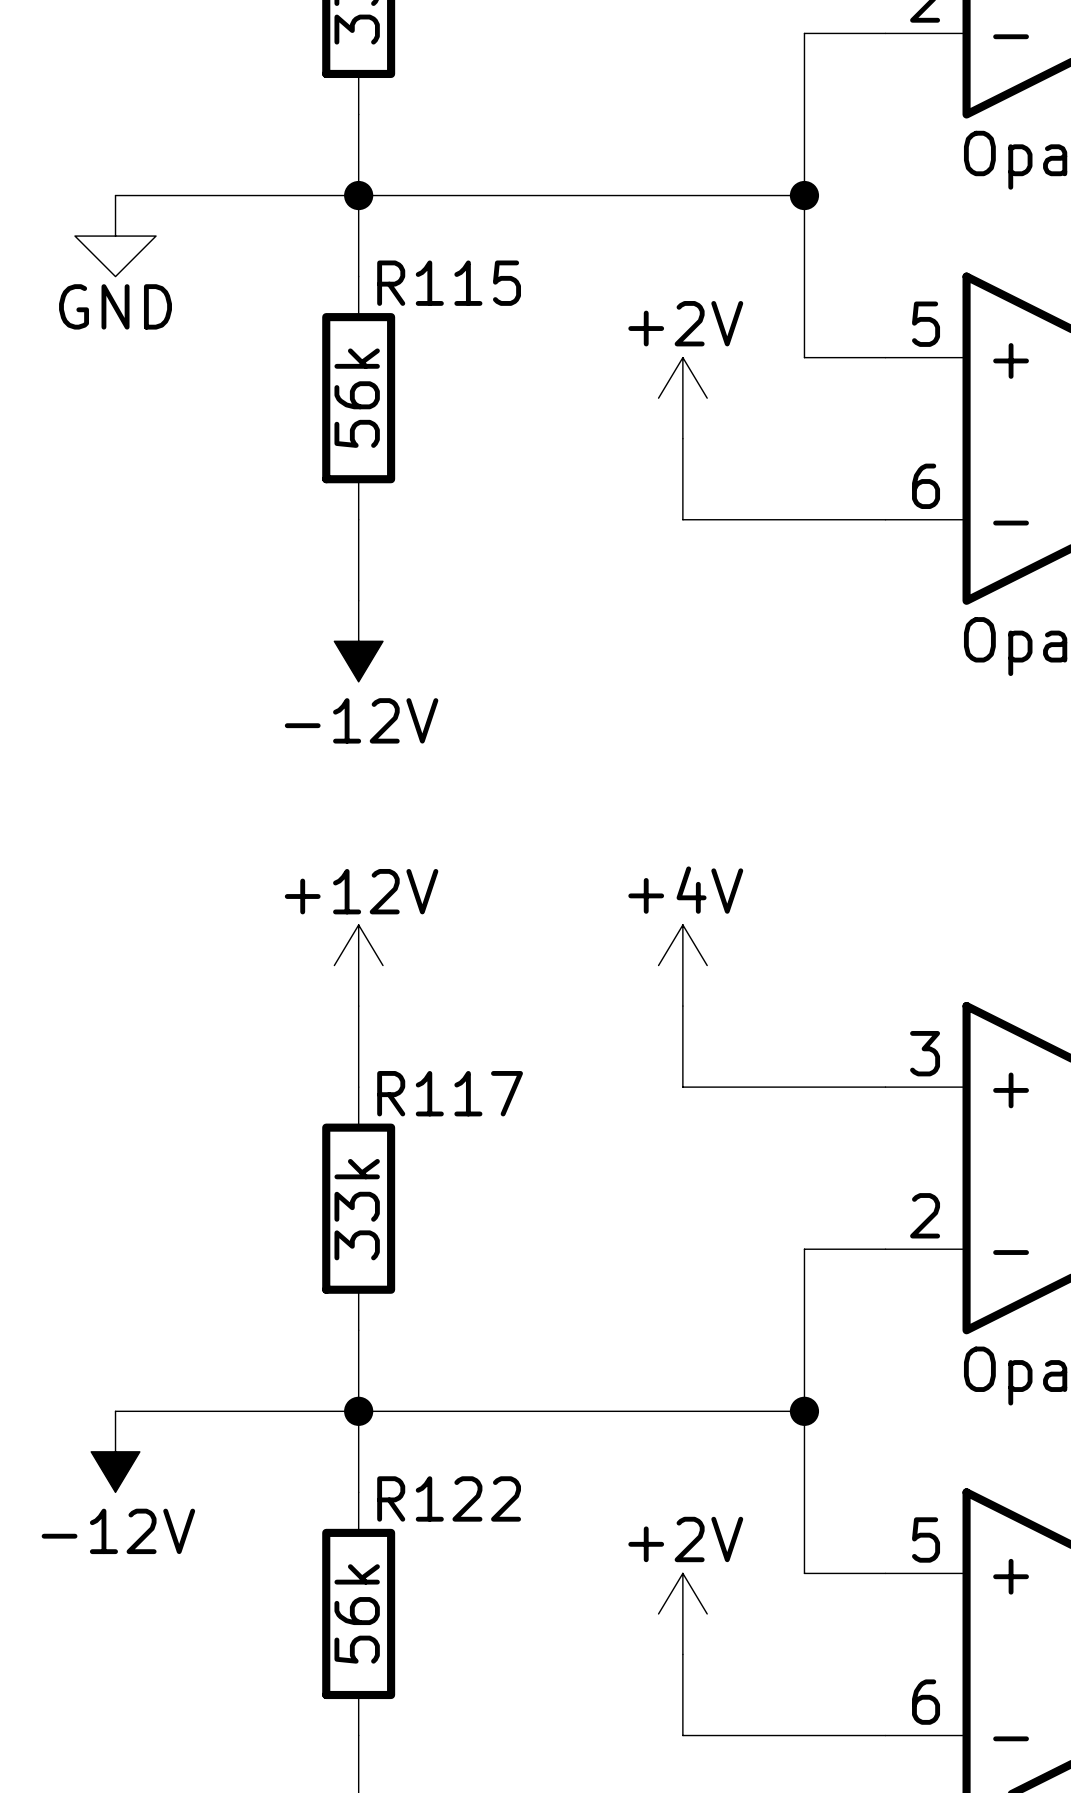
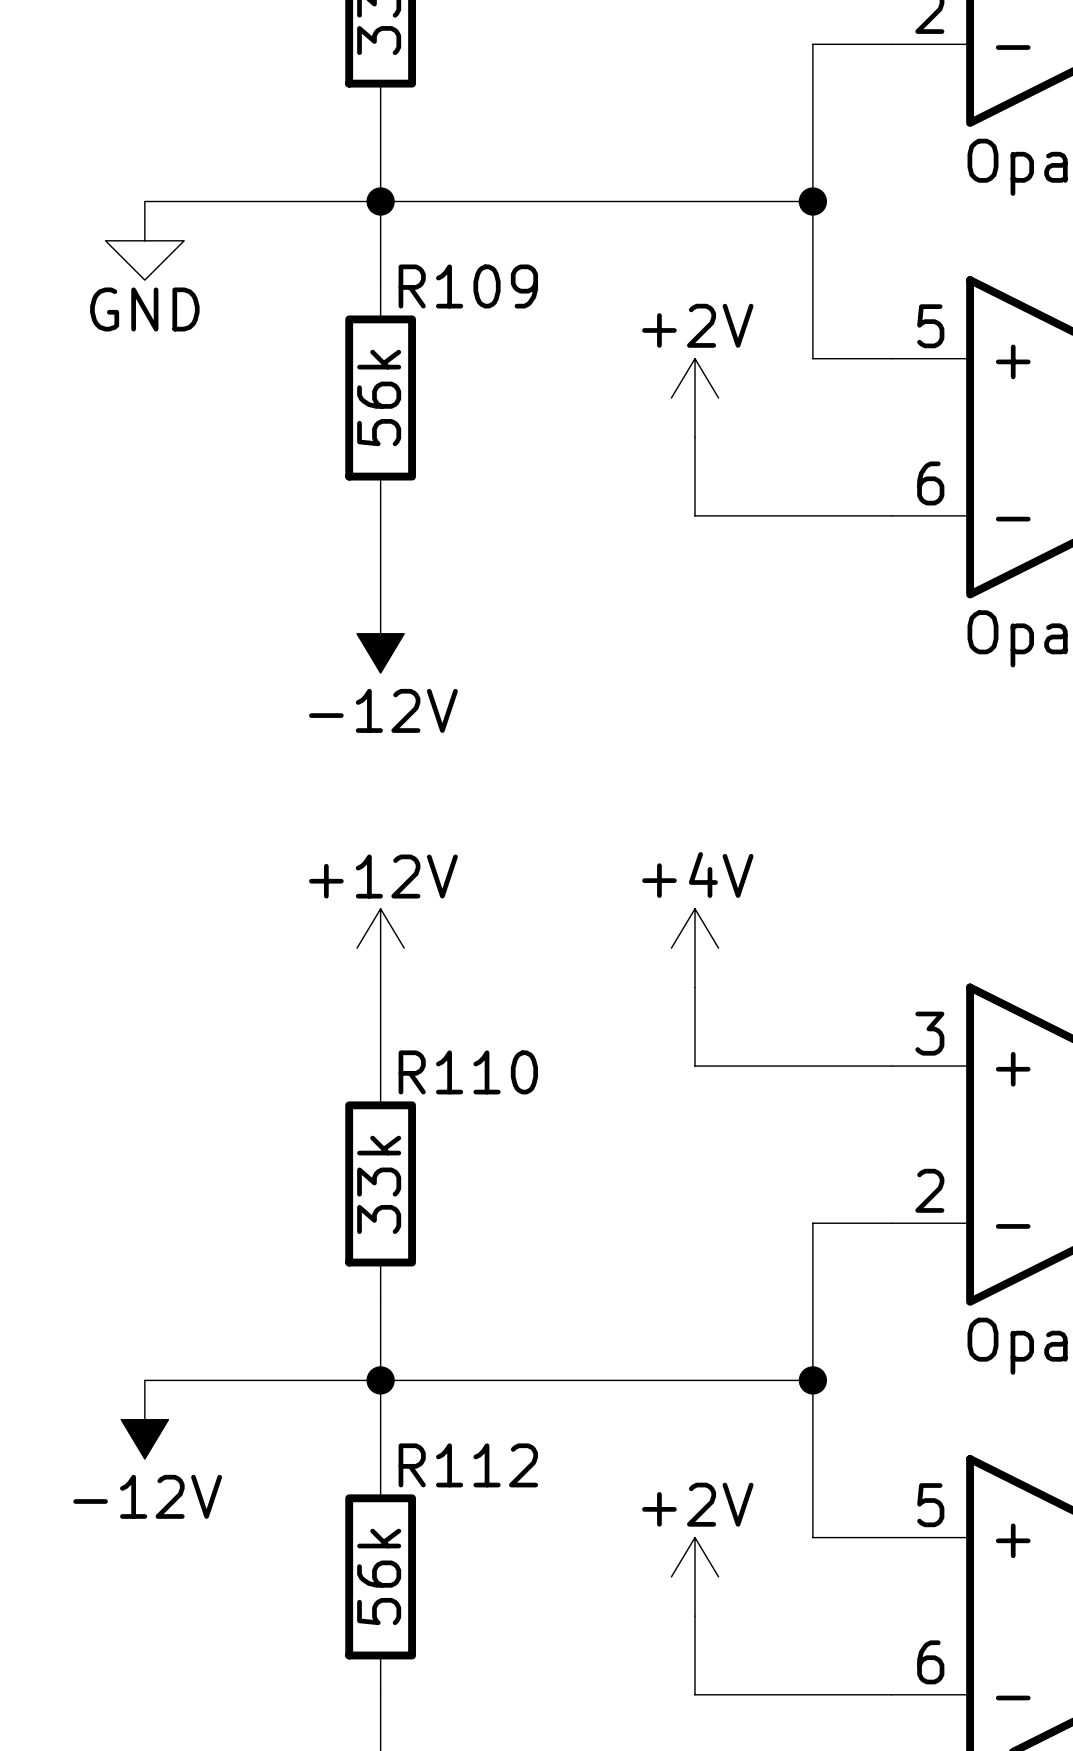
R115 name: R115 (449, 283) -> R109 (468, 286)
R117 name: R117 (450, 1093) -> R110 (468, 1072)
R122 name: R122 (449, 1498) -> R112 (468, 1465)

